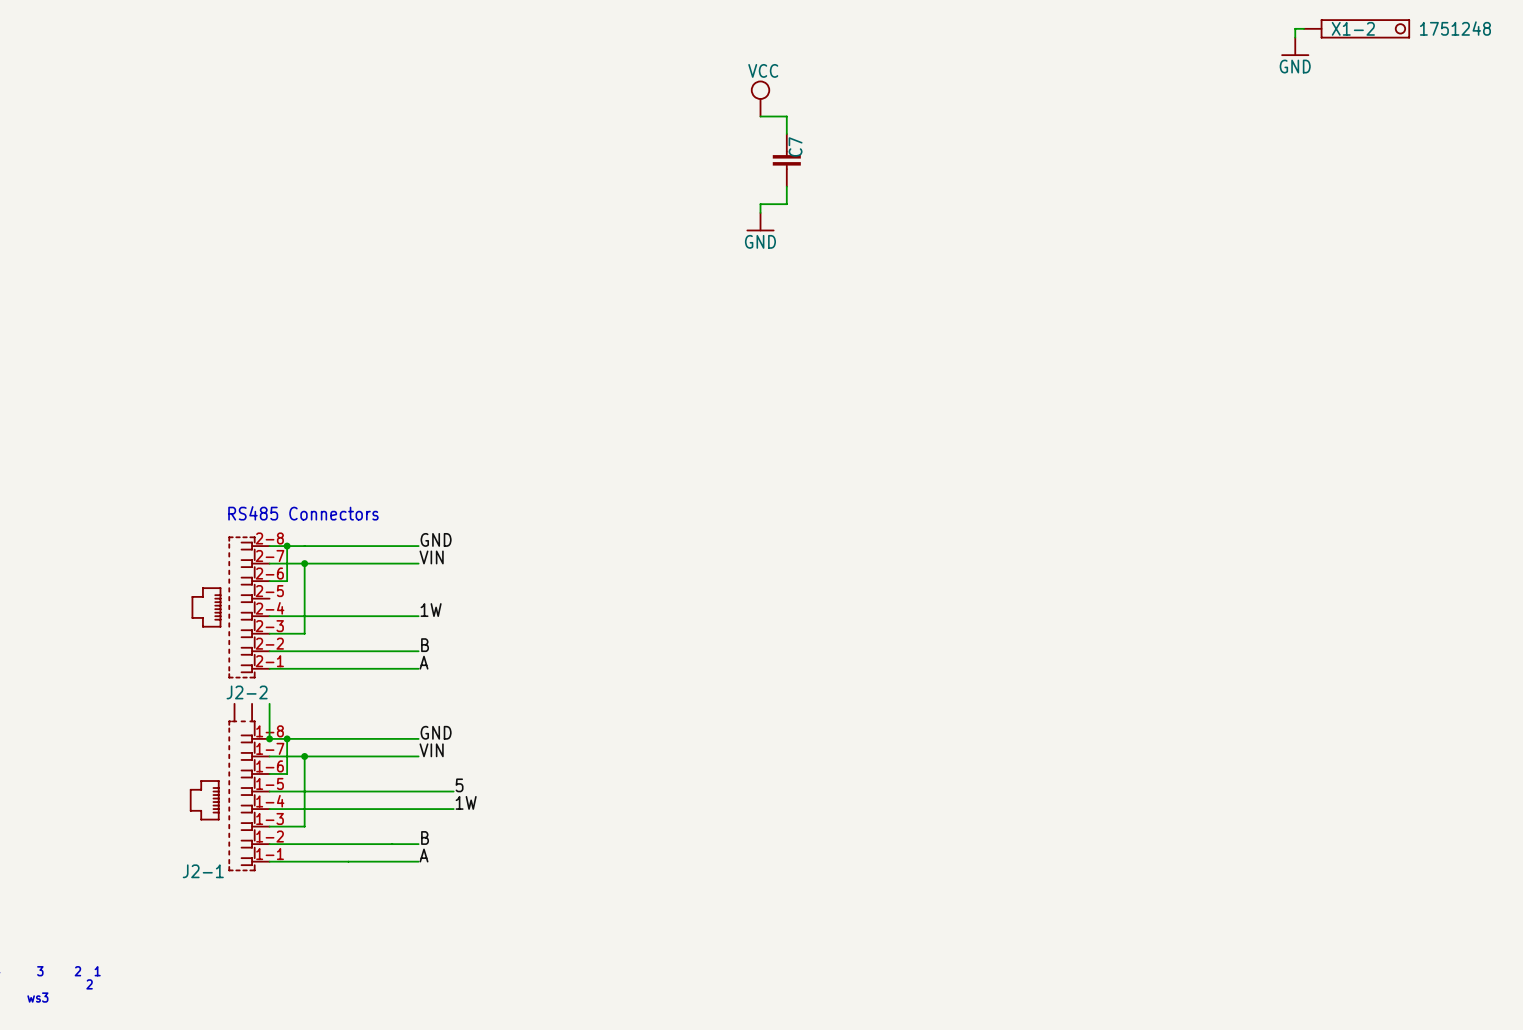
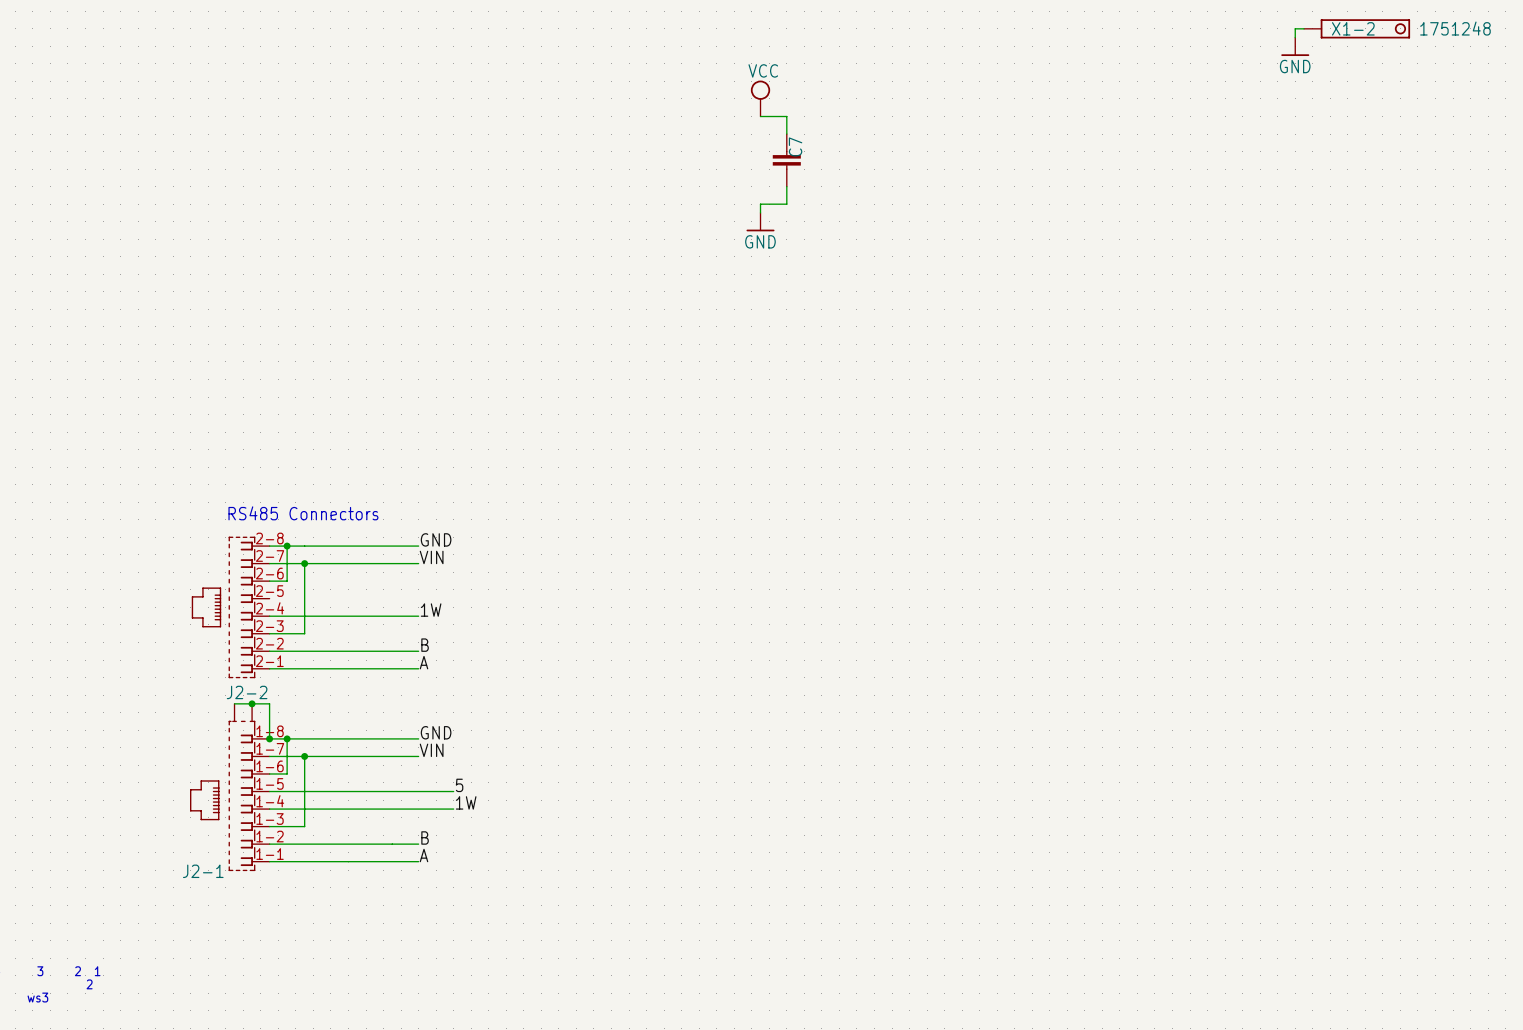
wire: none -> (234, 703) (269, 703)
junction: none -> (252, 703)

